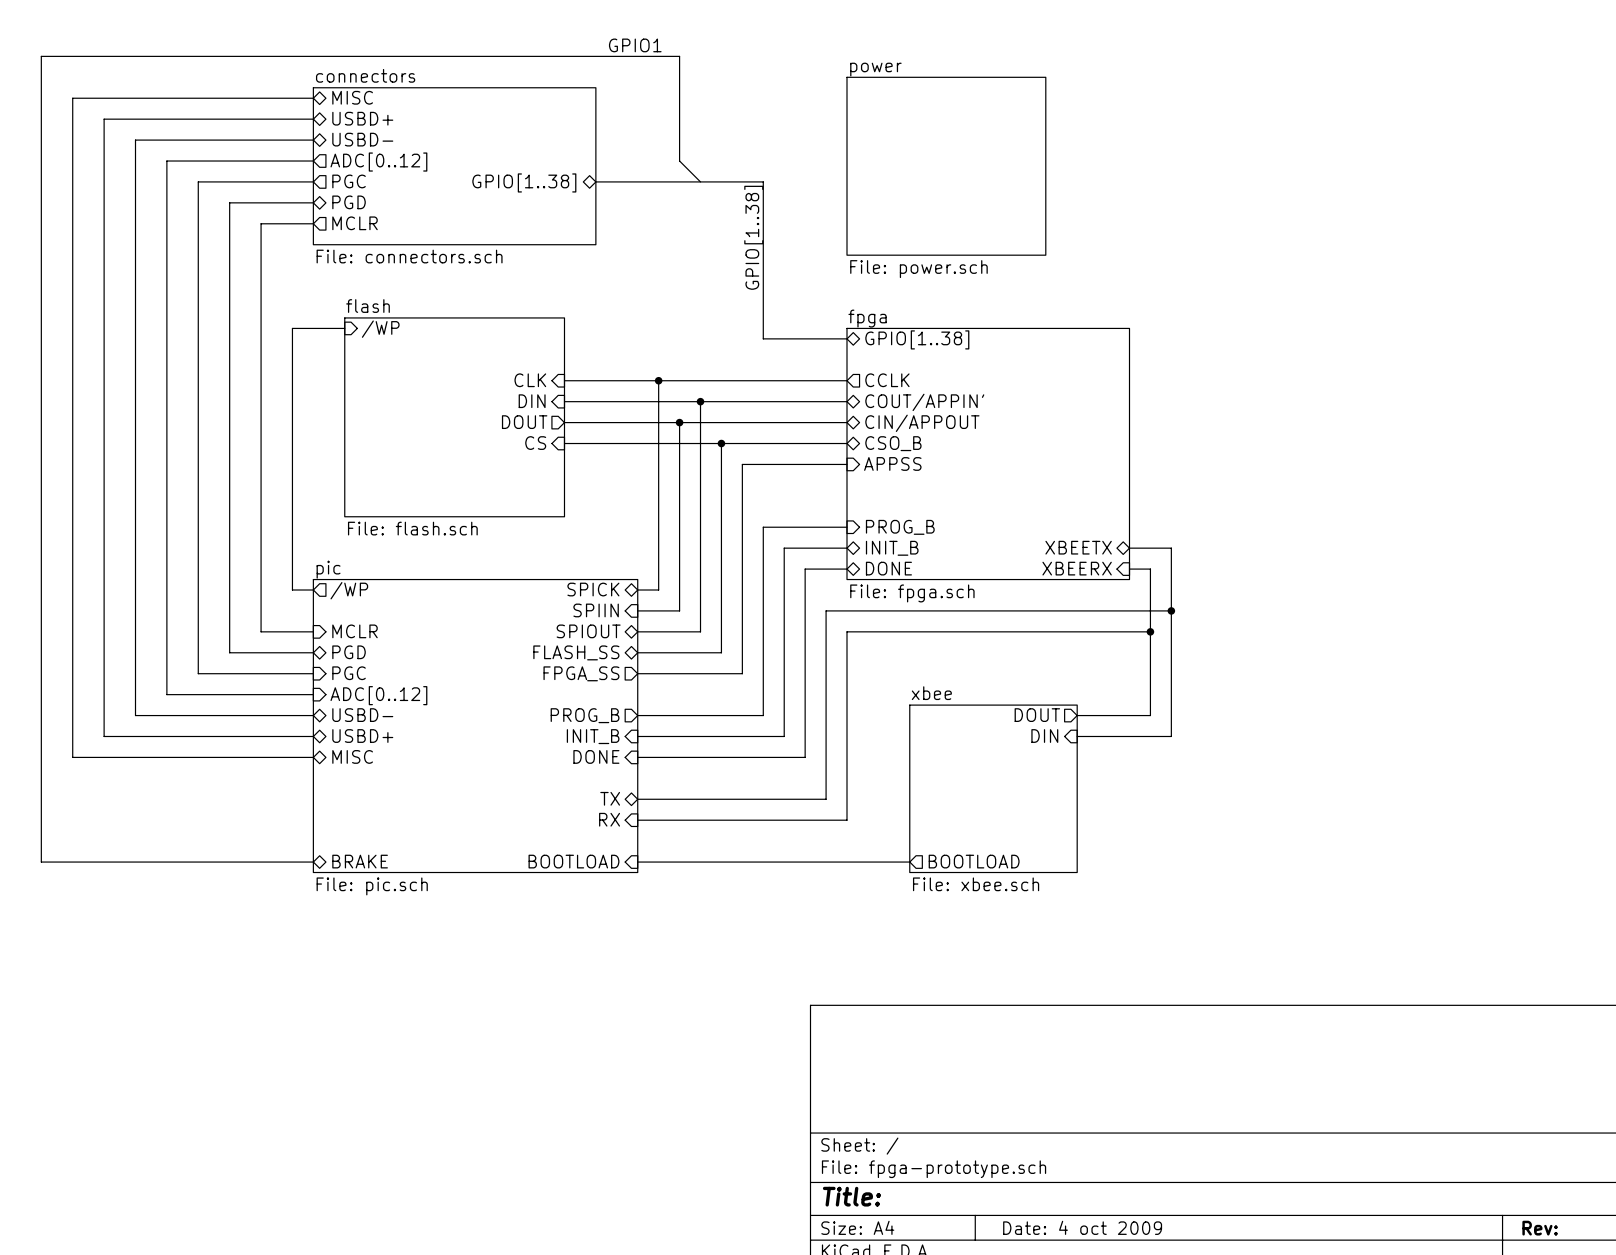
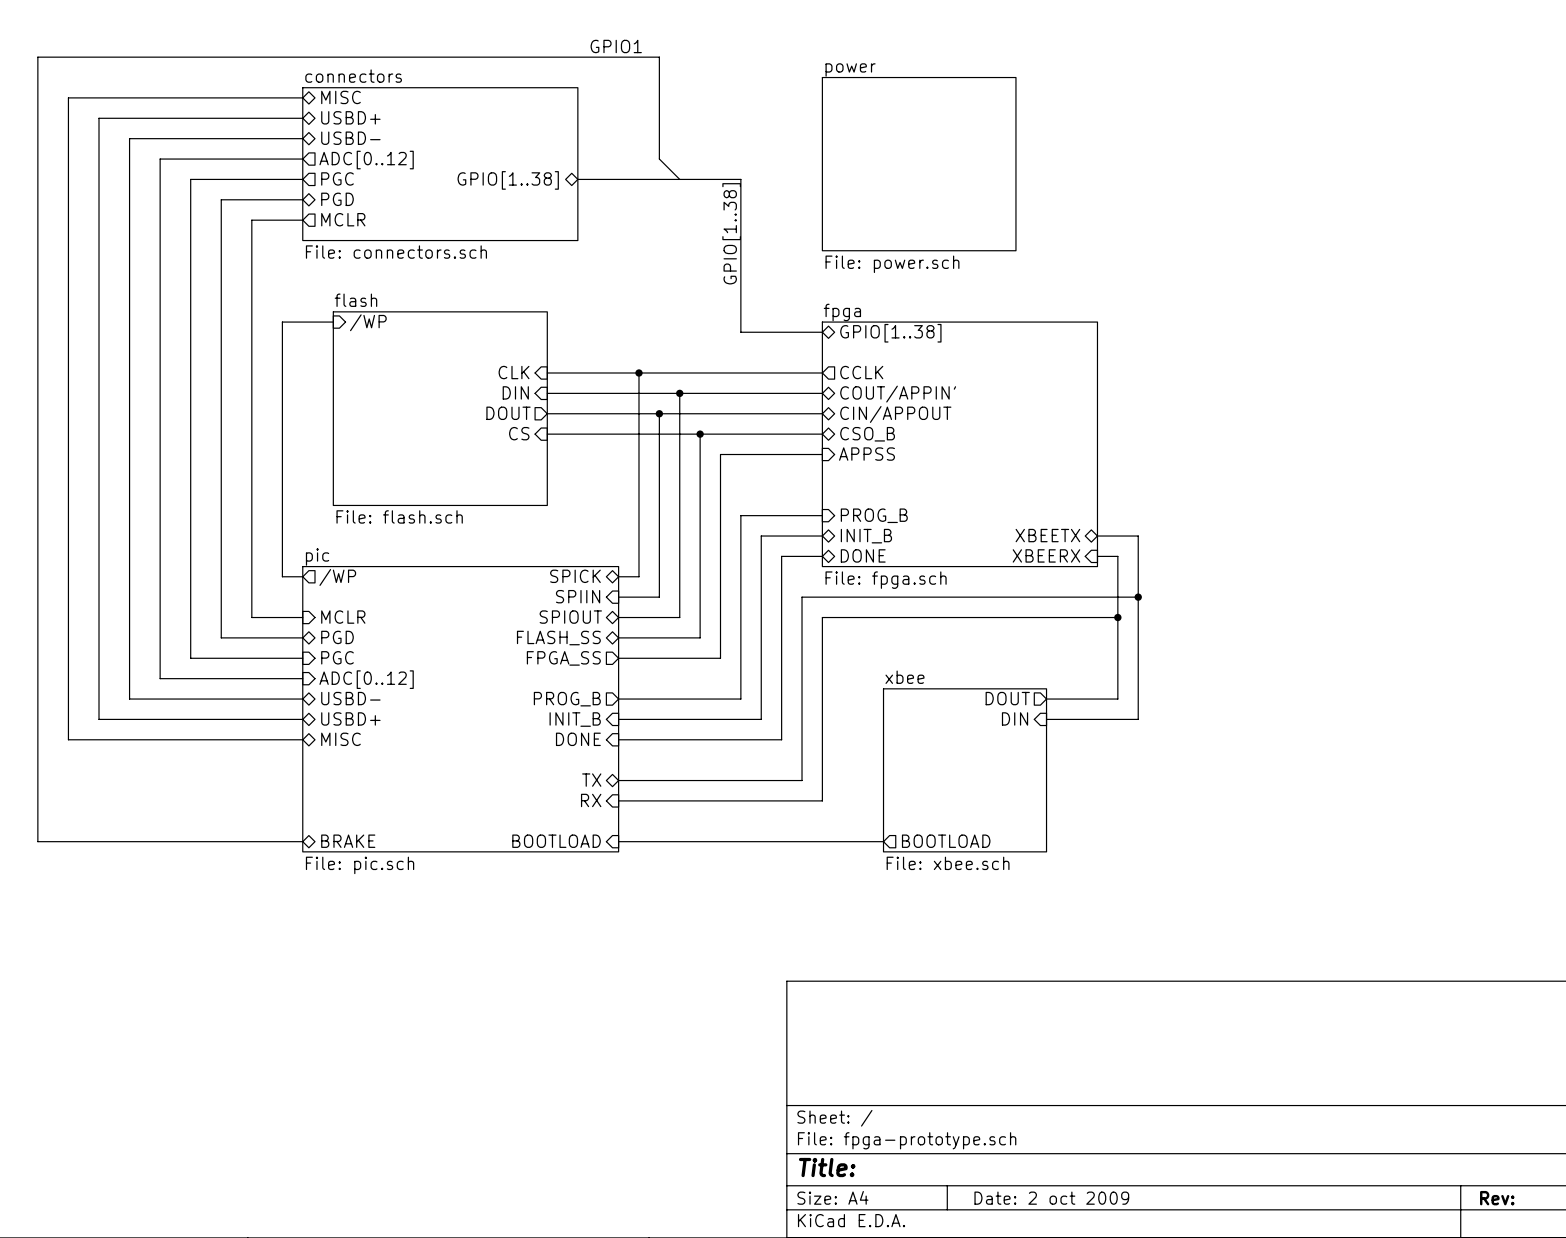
title block: Date: 4 oct 2009 (1082, 1227) -> Date: 2 oct 2009 (1051, 1198)

